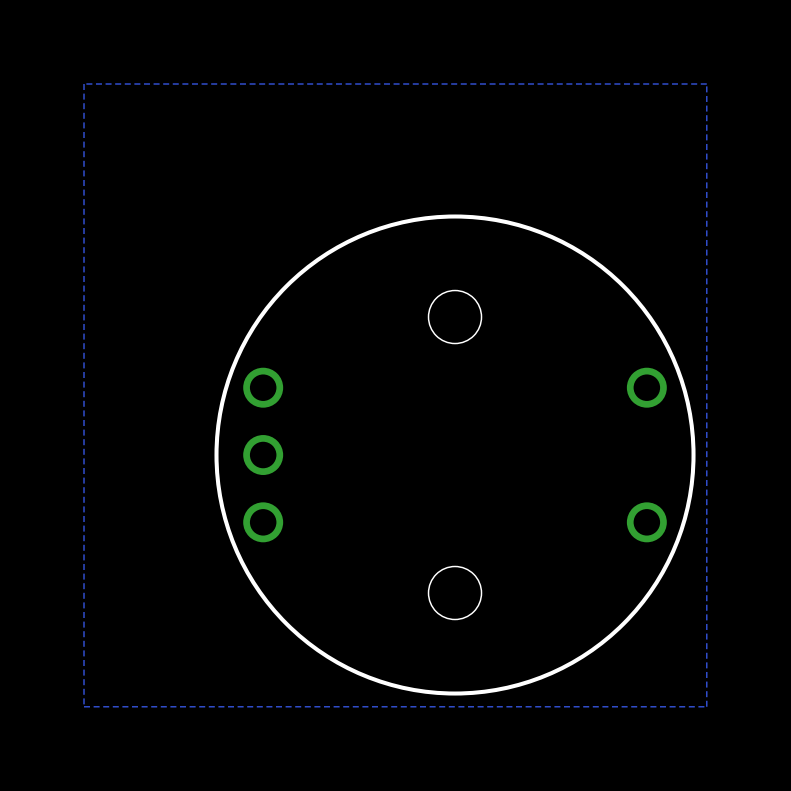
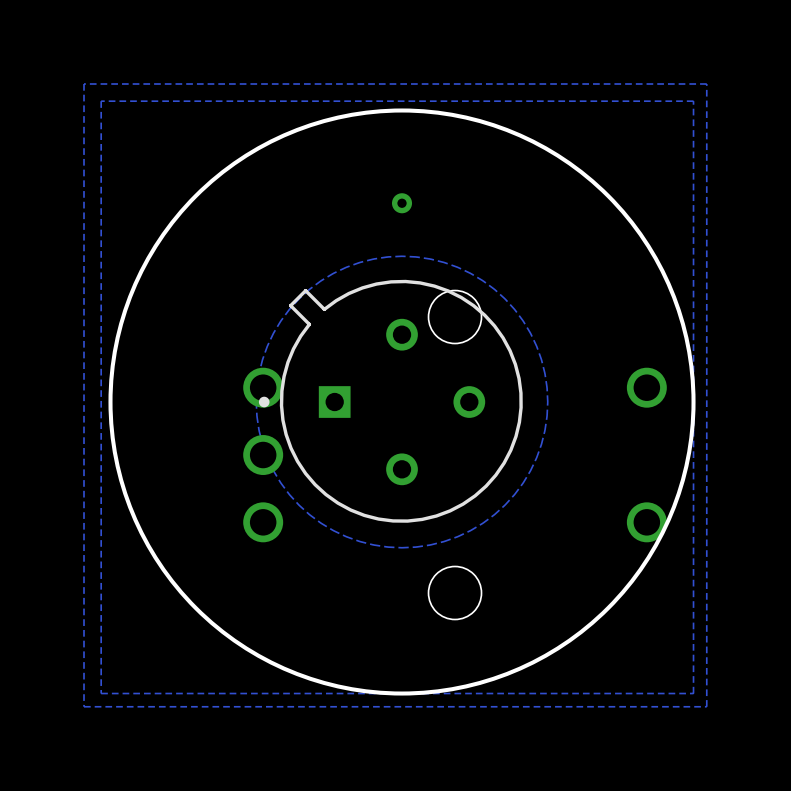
zone outline: none -> (693, 101) (693, 693) (101, 693) (101, 101) (693, 101)
round board edge: none -> [108, 108, 696, 696]
via: none -> (402, 203)
round board edge: [214, 214, 696, 696] -> none
zone outline: none -> (402, 256) (373, 259) (346, 267) (321, 280) (298, 298) (280, 321) (267, 346) (259, 373) (256, 402) (259, 430) (267, 457) (280, 482) (298, 505) (321, 523) (346, 536) (373, 544) (402, 547) (430, 544) (457, 536) (482, 523) (505, 505) (523, 482) (536, 457) (544, 430) (547, 402) (544, 373) (536, 346) (523, 321) (505, 298) (482, 280) (457, 267) (430, 259) (402, 256)
part: none -> (390, 401)

